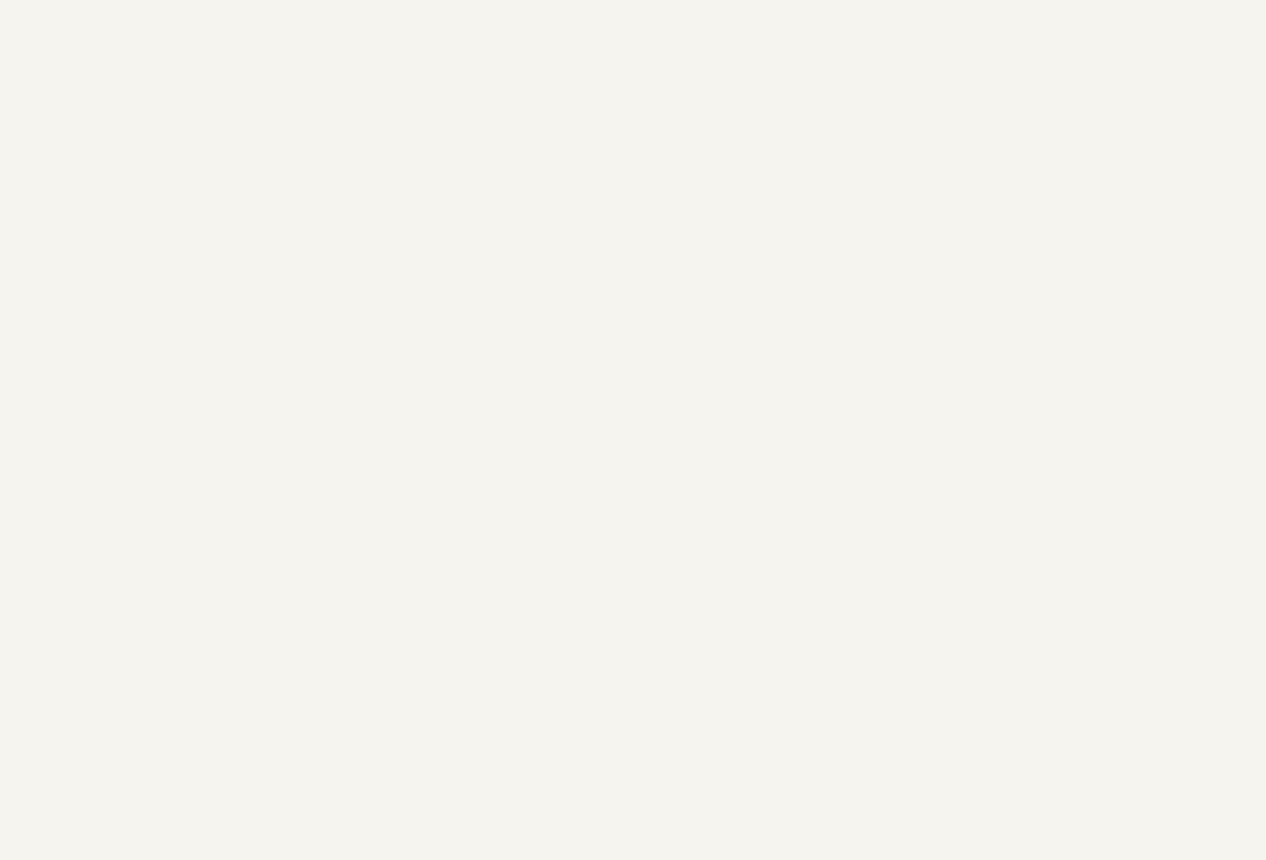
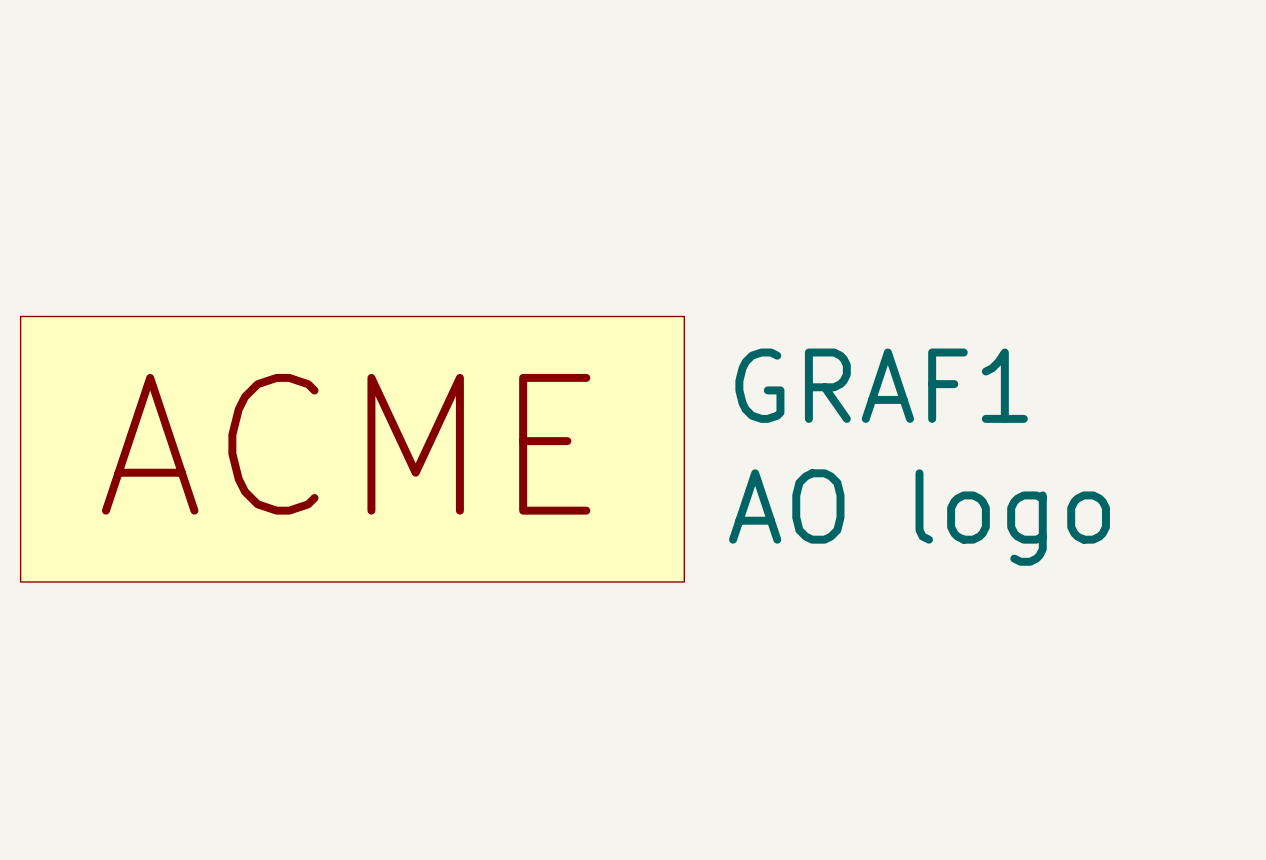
GRAF1: none -> AO logo (352, 449)

